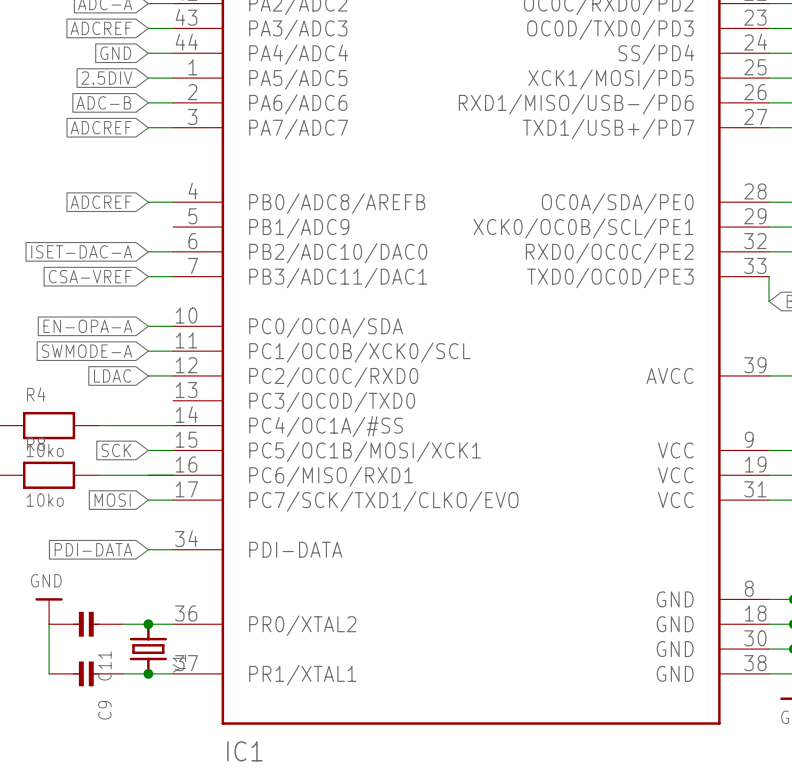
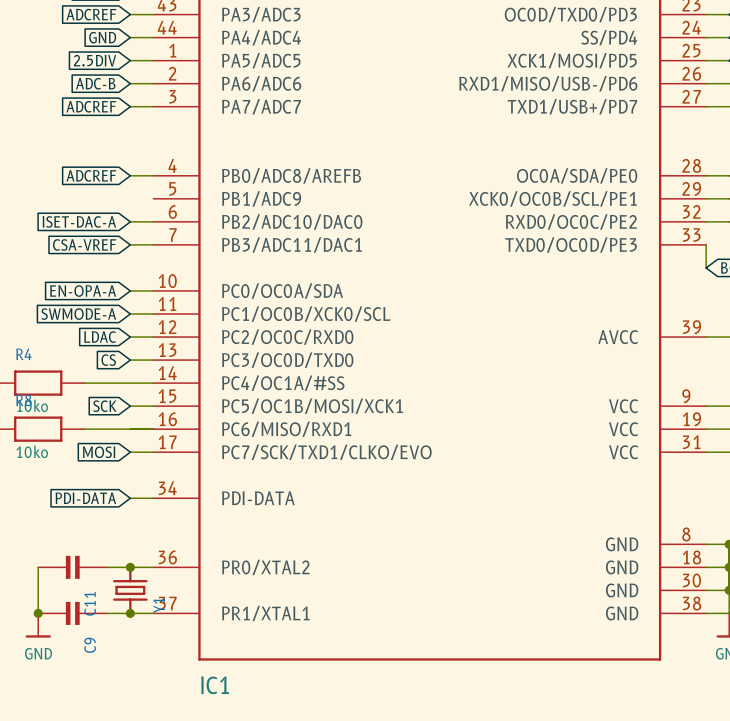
global label: none -> CS (108, 360)
wire: none -> (130, 360) (153, 360)
power symbol rotation: 0° (49, 599) -> 180° (38, 636)
power symbol position: GND (49, 611) -> GND (38, 625)
junction: none -> (38, 613)

